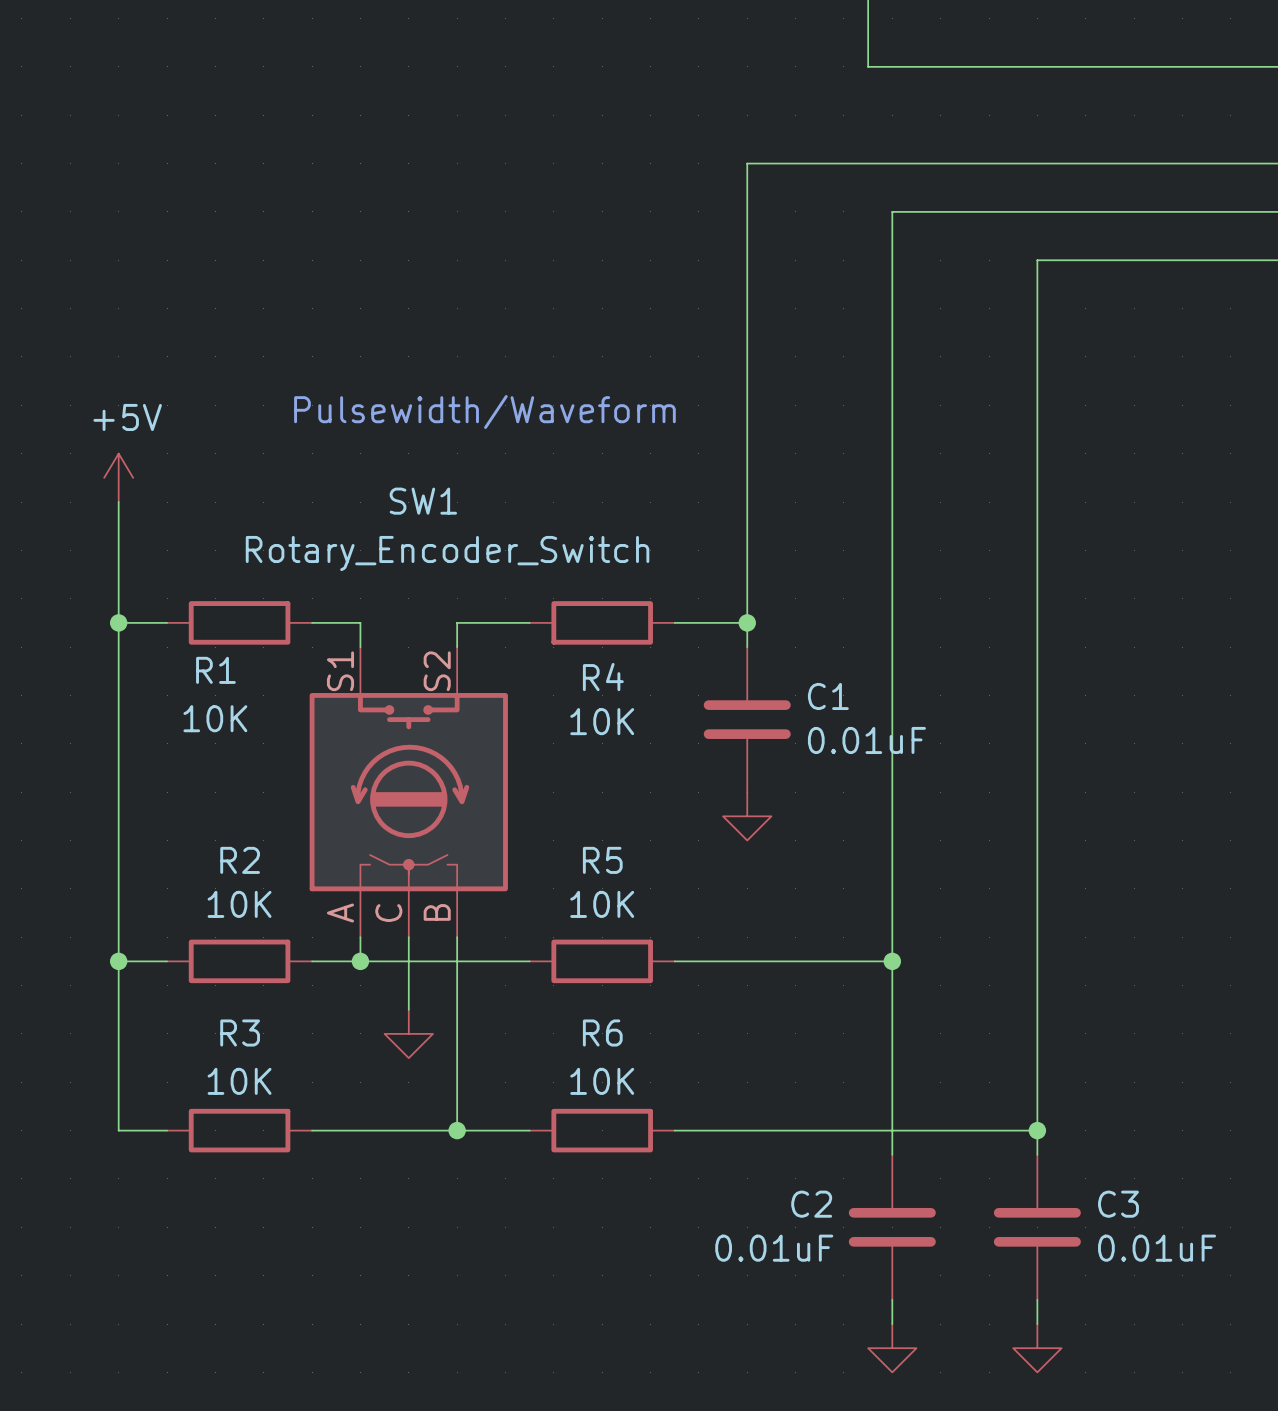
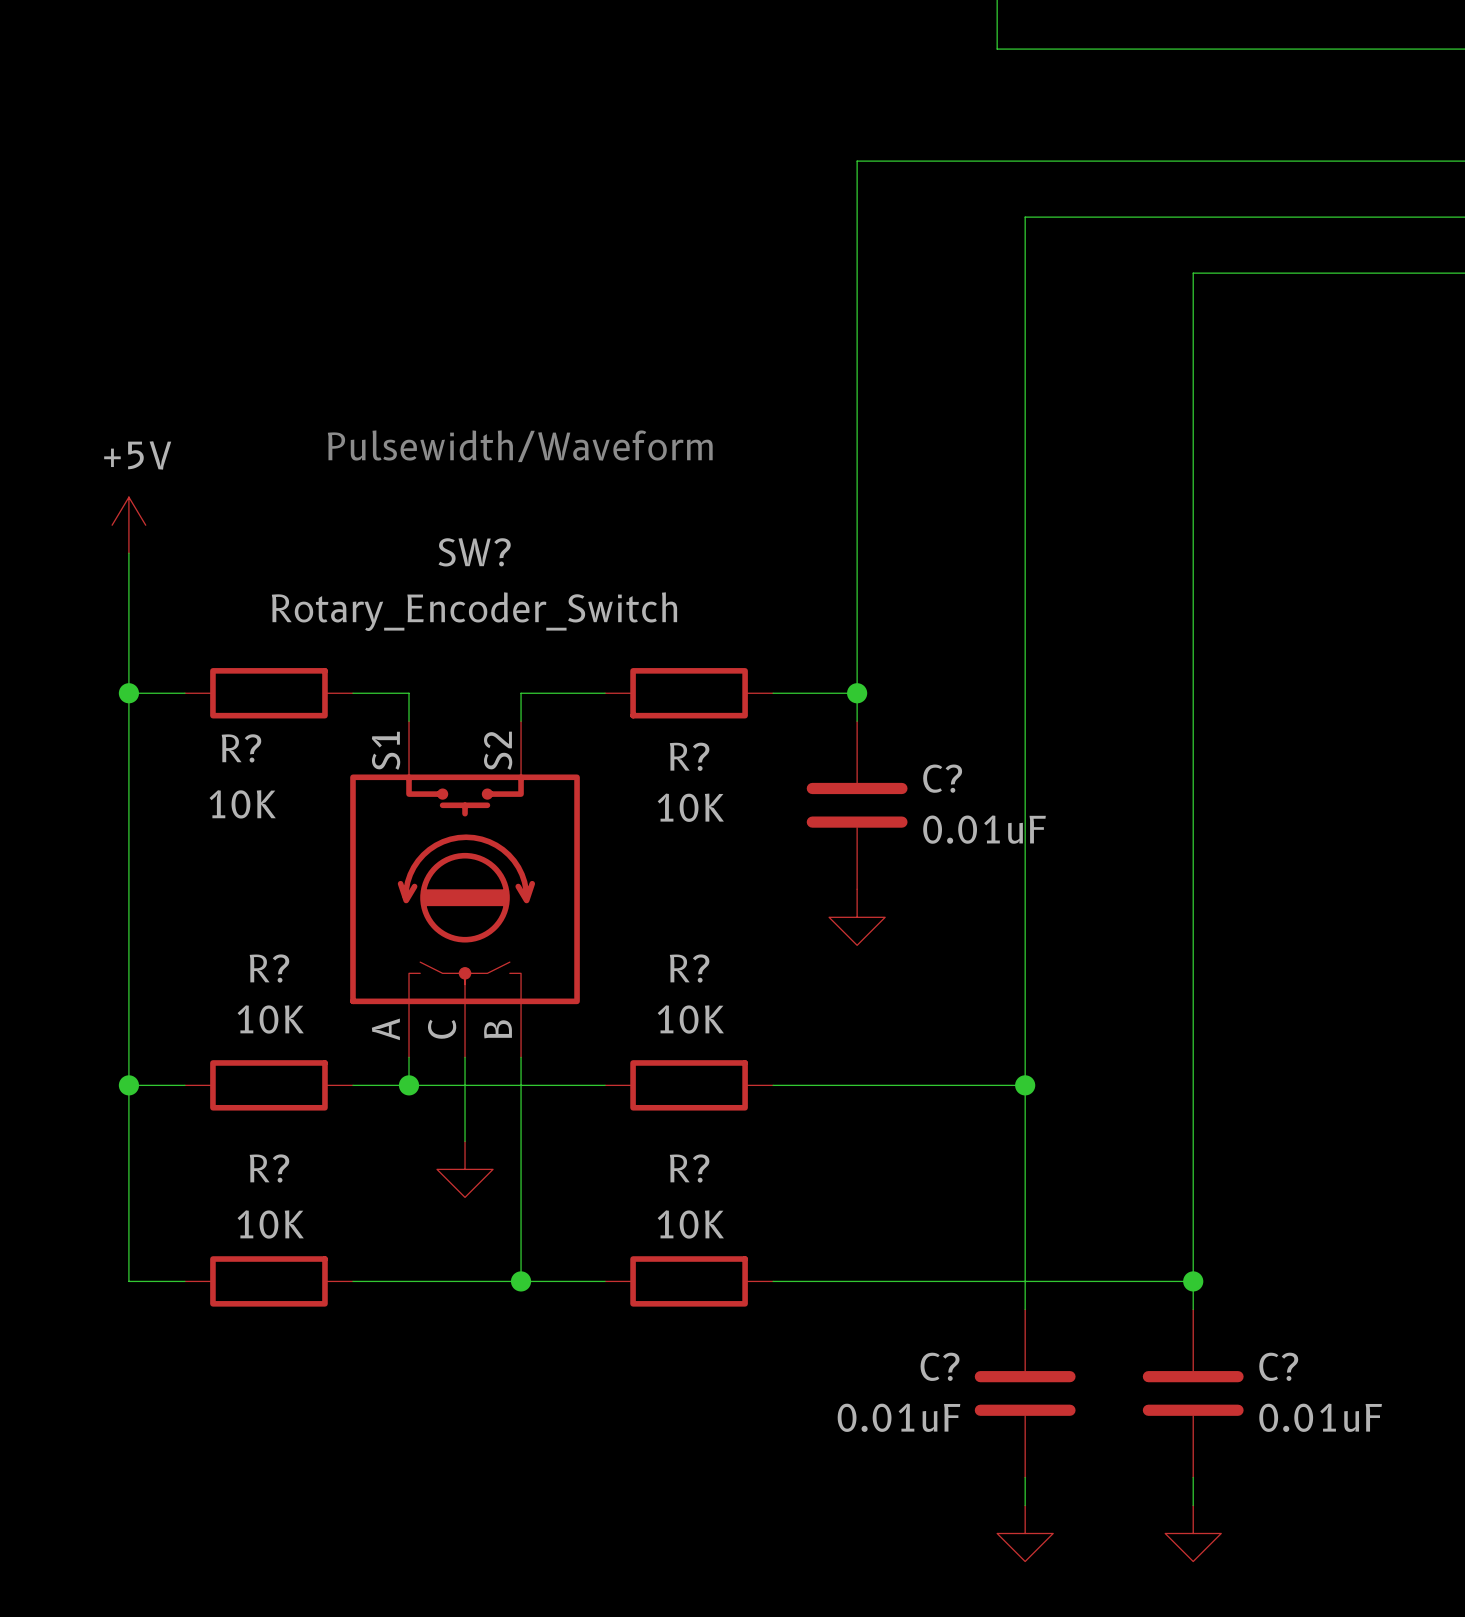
SW1 name: SW1 (423, 501) -> SW? (474, 552)
R1 name: R1 (215, 670) -> R? (241, 748)
R4 name: R4 (603, 677) -> R? (689, 756)
C1 name: C1 (828, 696) -> C? (942, 778)
R2 name: R2 (240, 860) -> R? (269, 968)
R5 name: R5 (602, 860) -> R? (689, 968)
R3 name: R3 (240, 1033) -> R? (269, 1168)
R6 name: R6 (602, 1033) -> R? (689, 1168)
C2 name: C2 (811, 1204) -> C? (940, 1366)
C3 name: C3 (1118, 1204) -> C? (1278, 1366)

